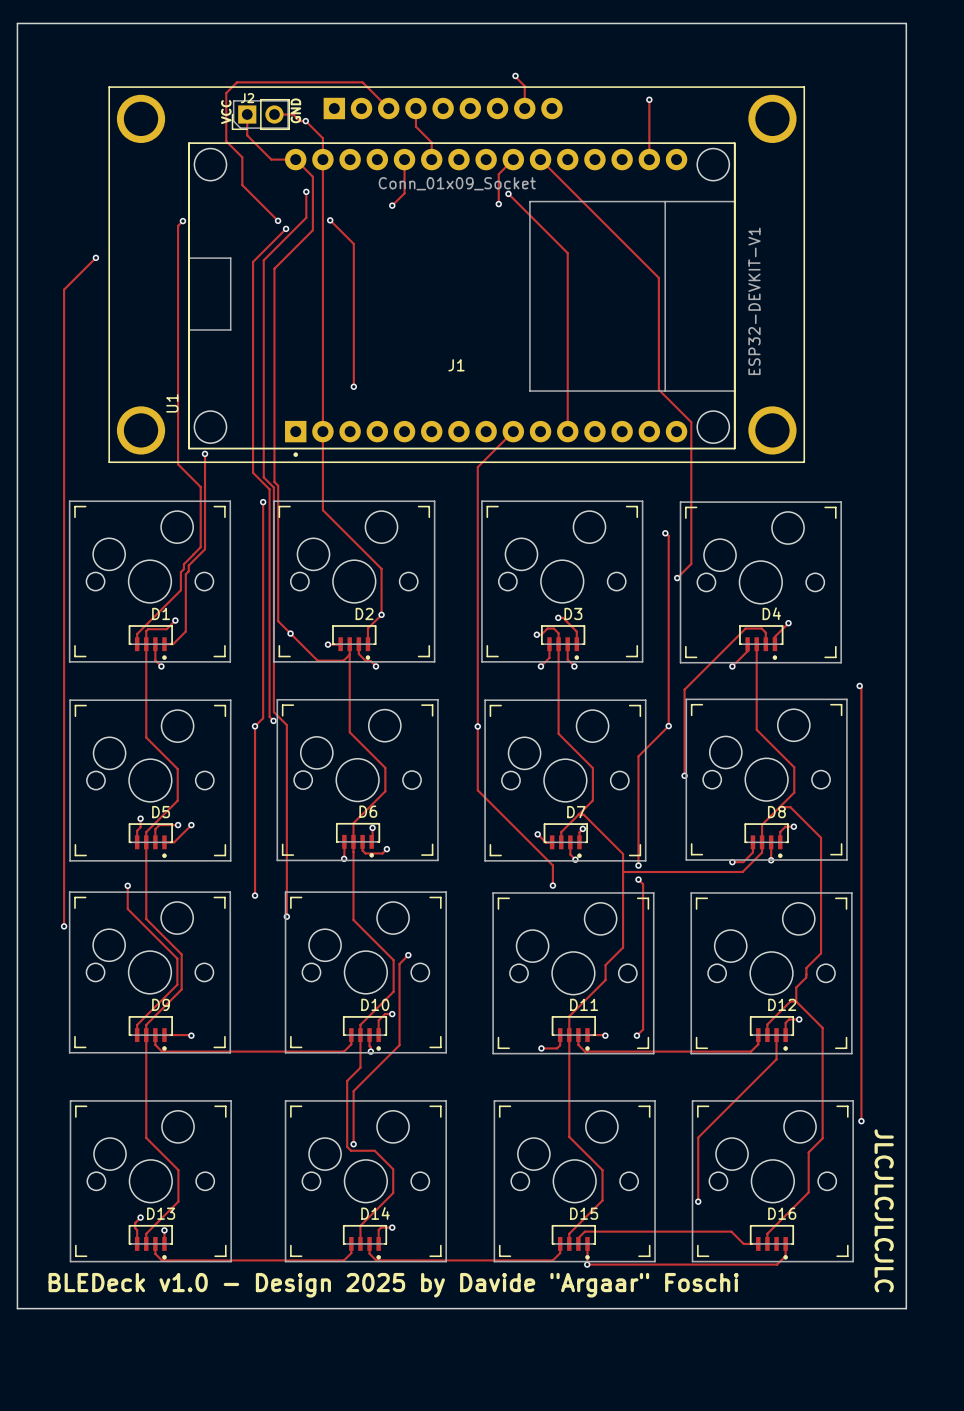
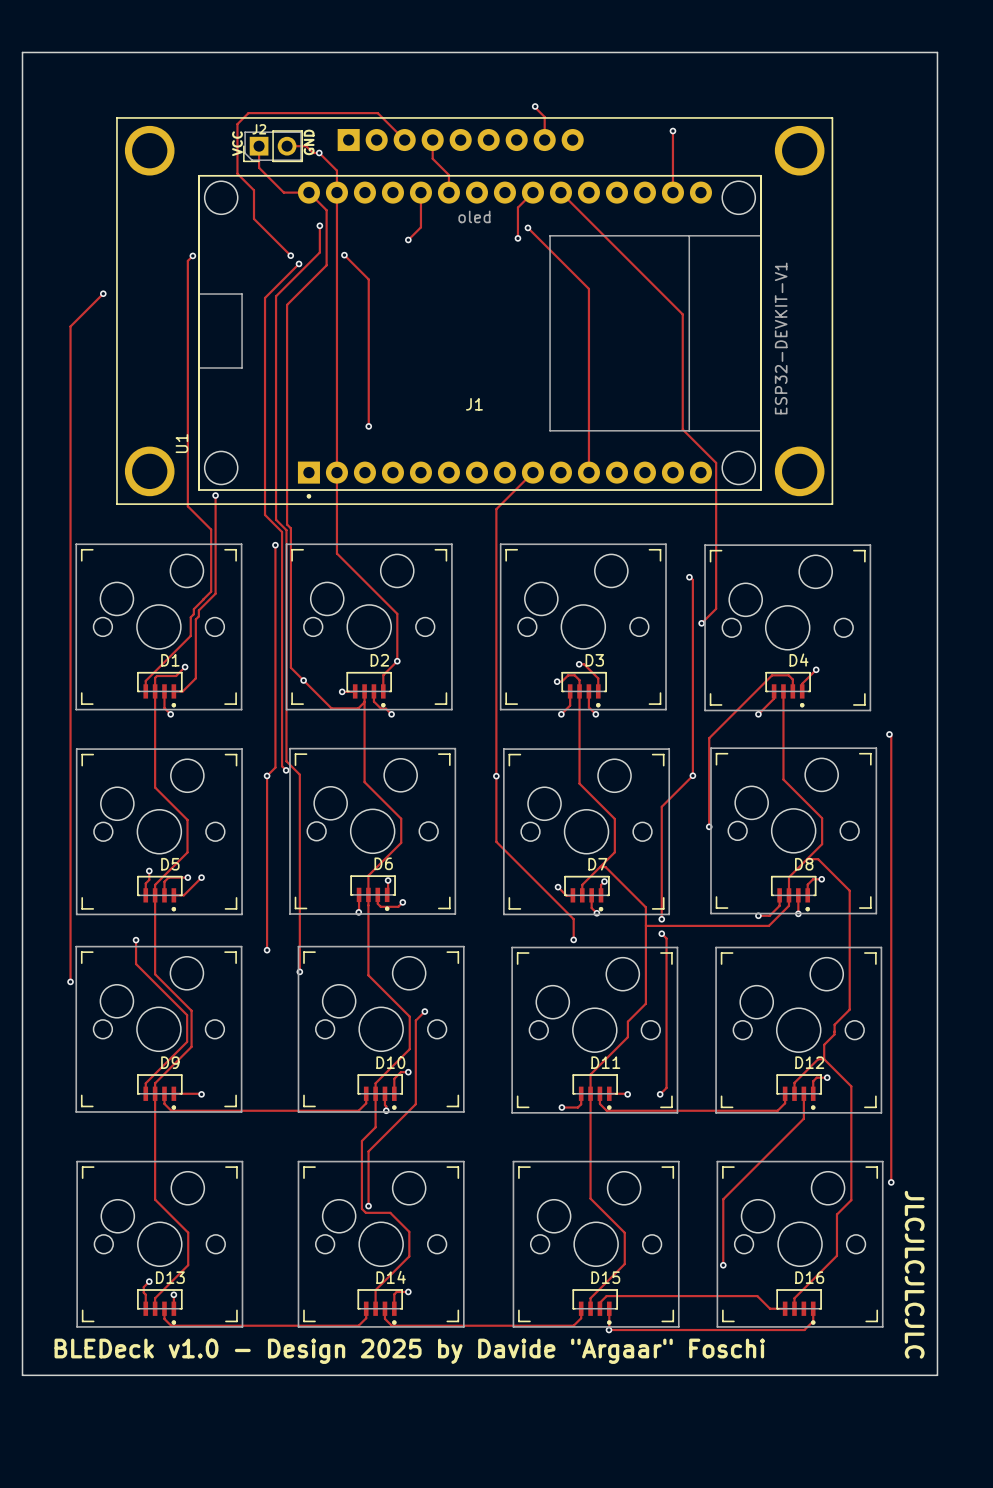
J1 value: Conn_01x09_Socket (457, 183) -> oled (474, 216)

